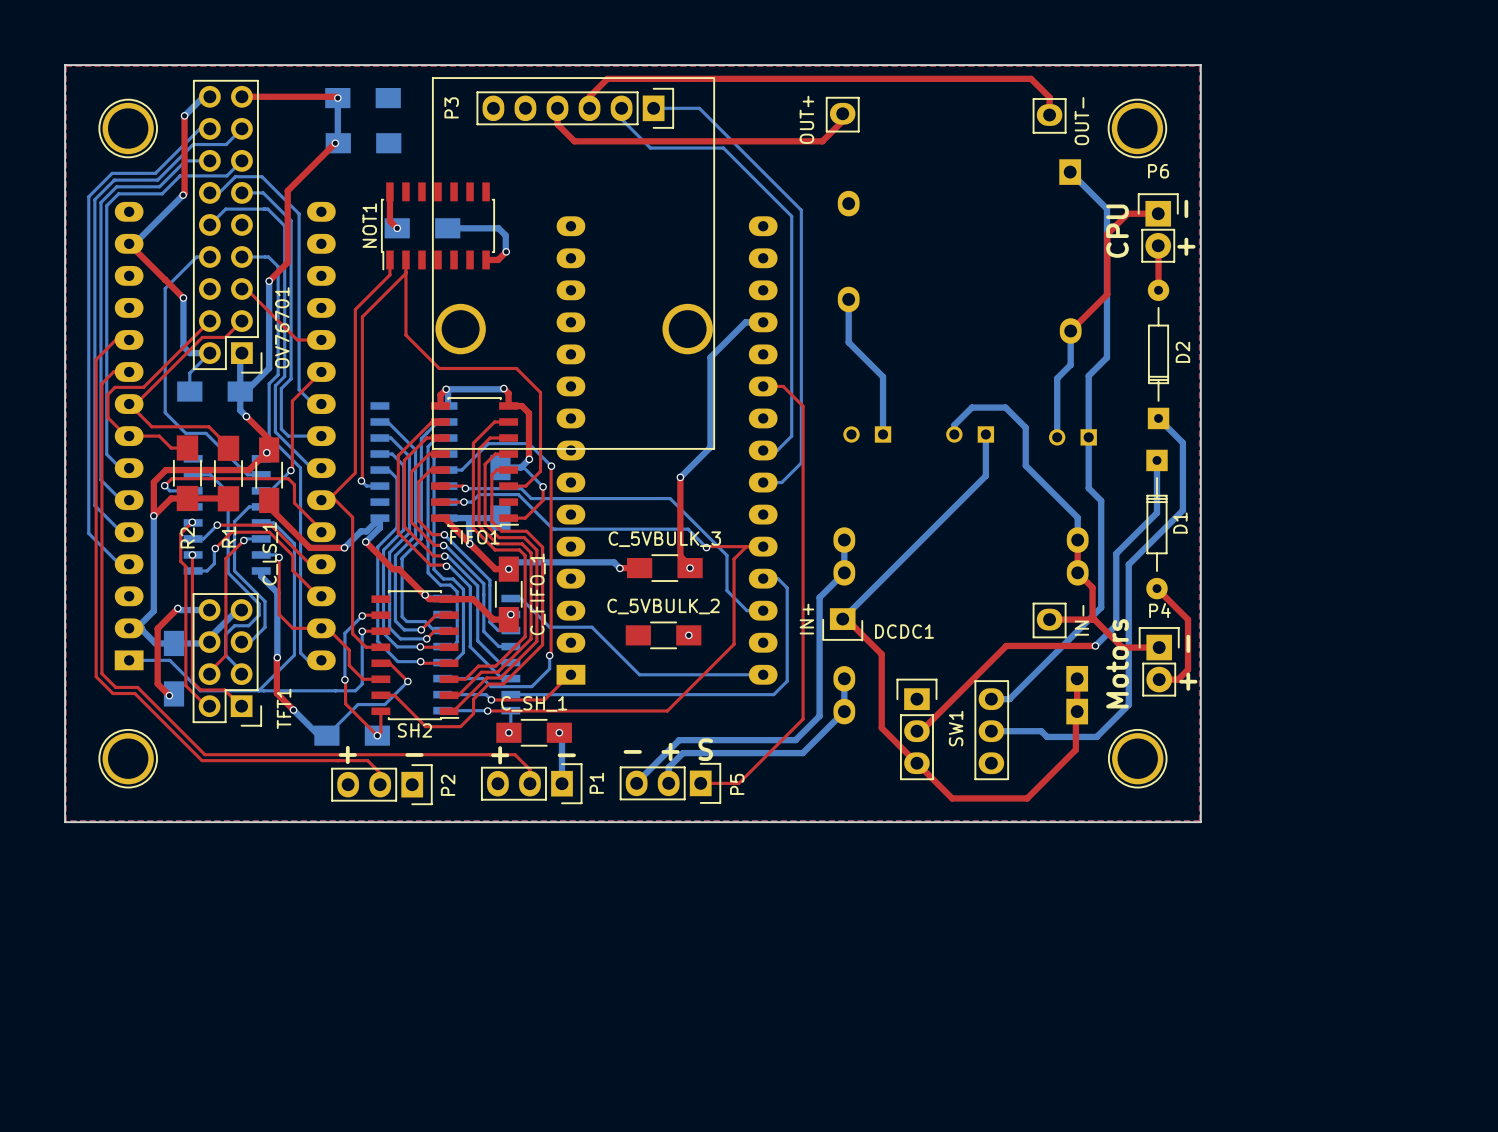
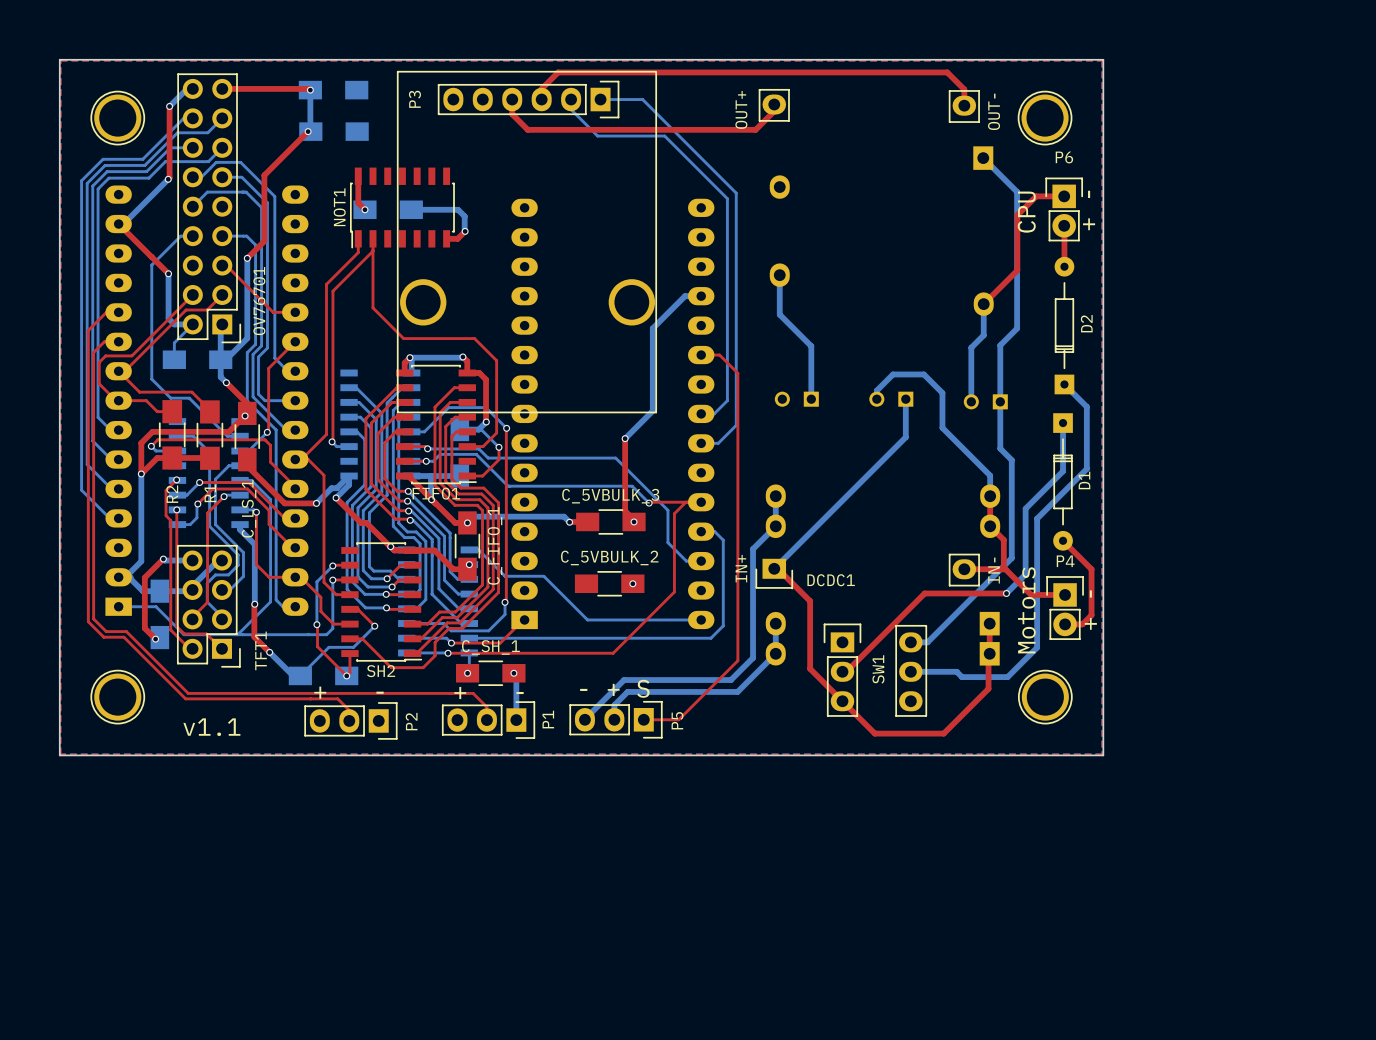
text: none -> v1.1 (211, 727)

